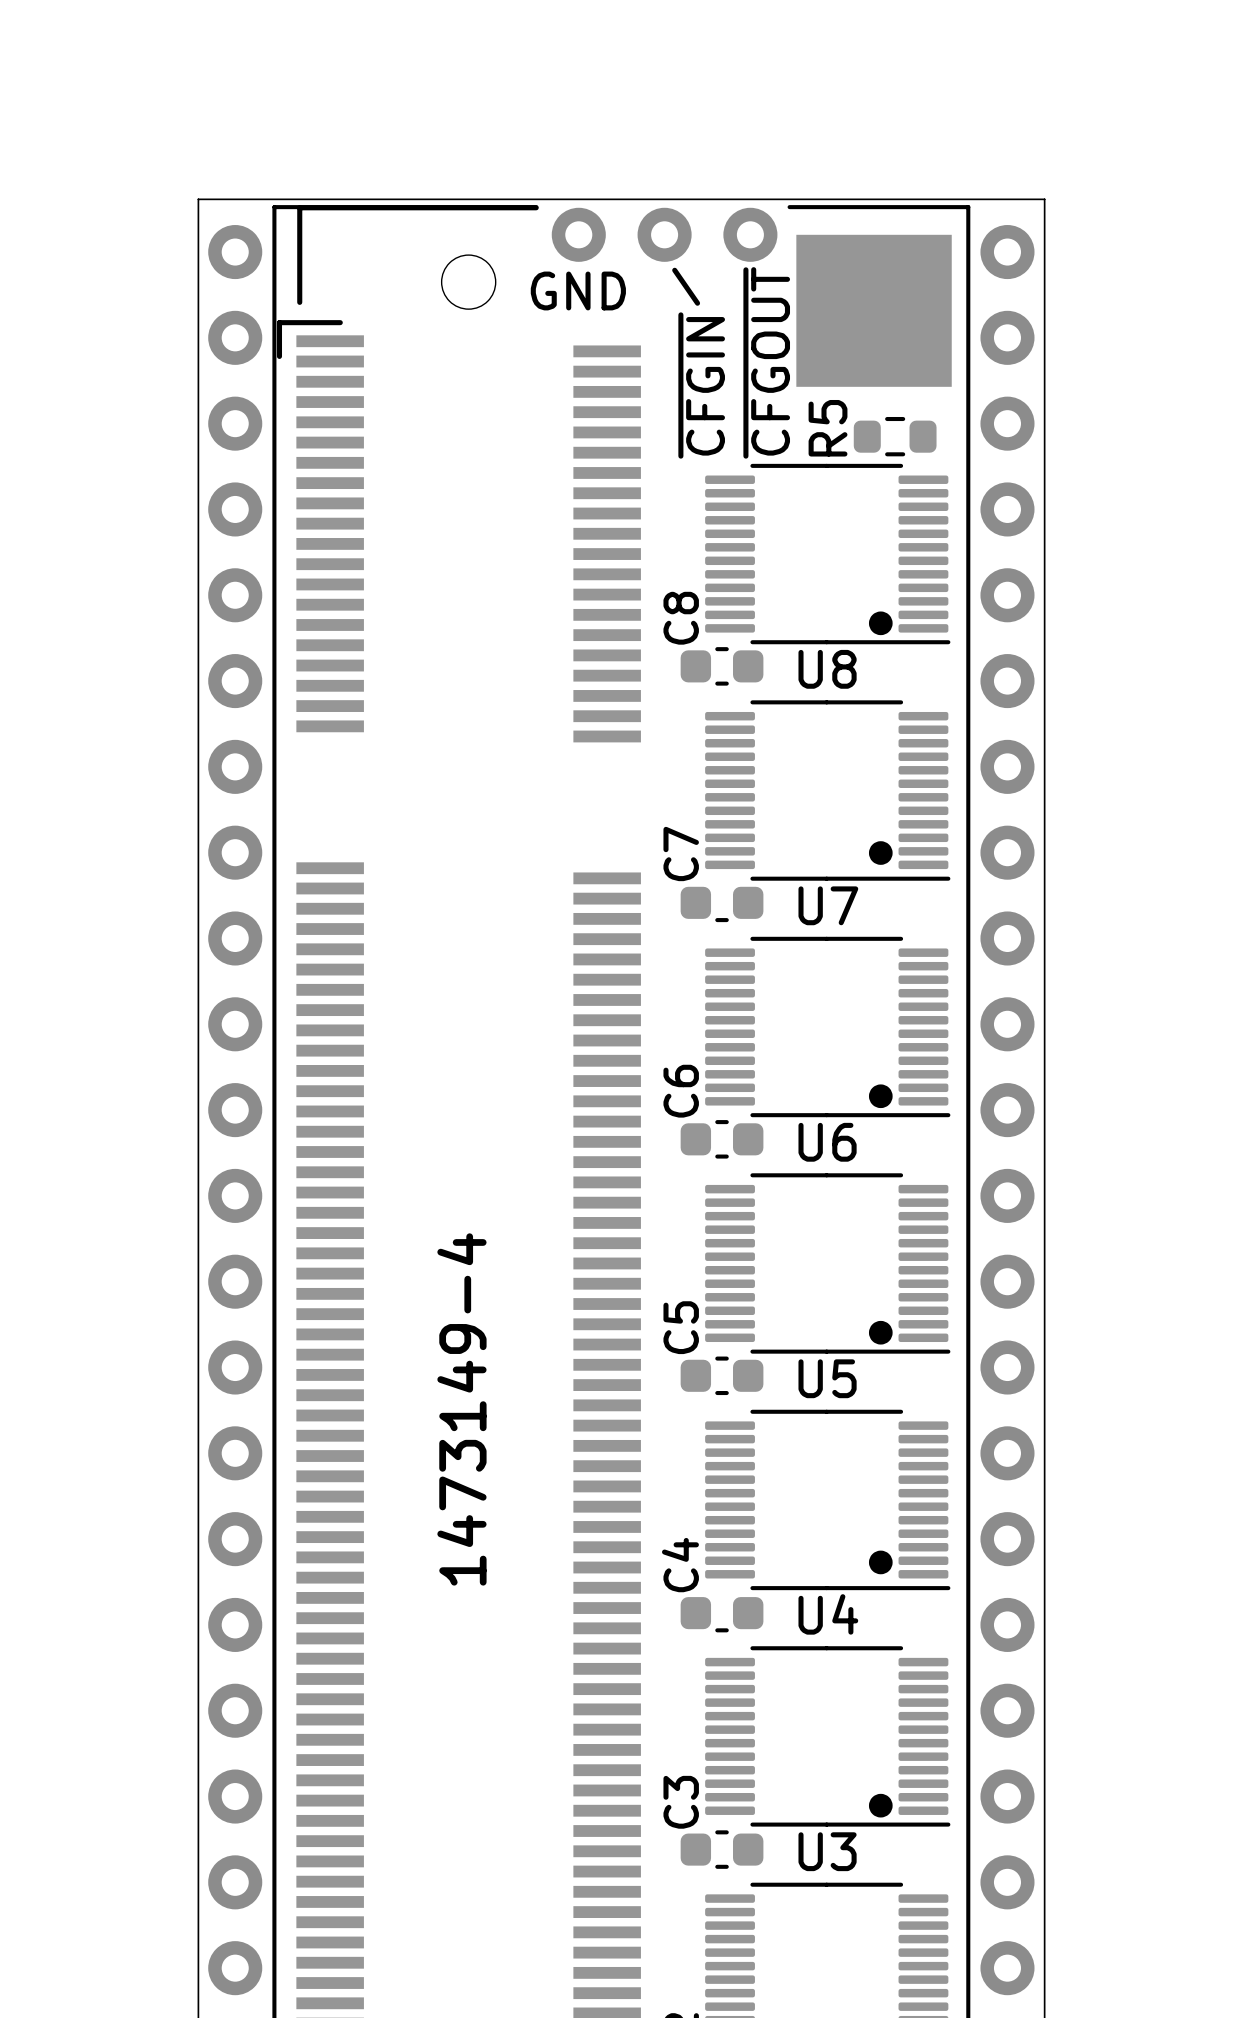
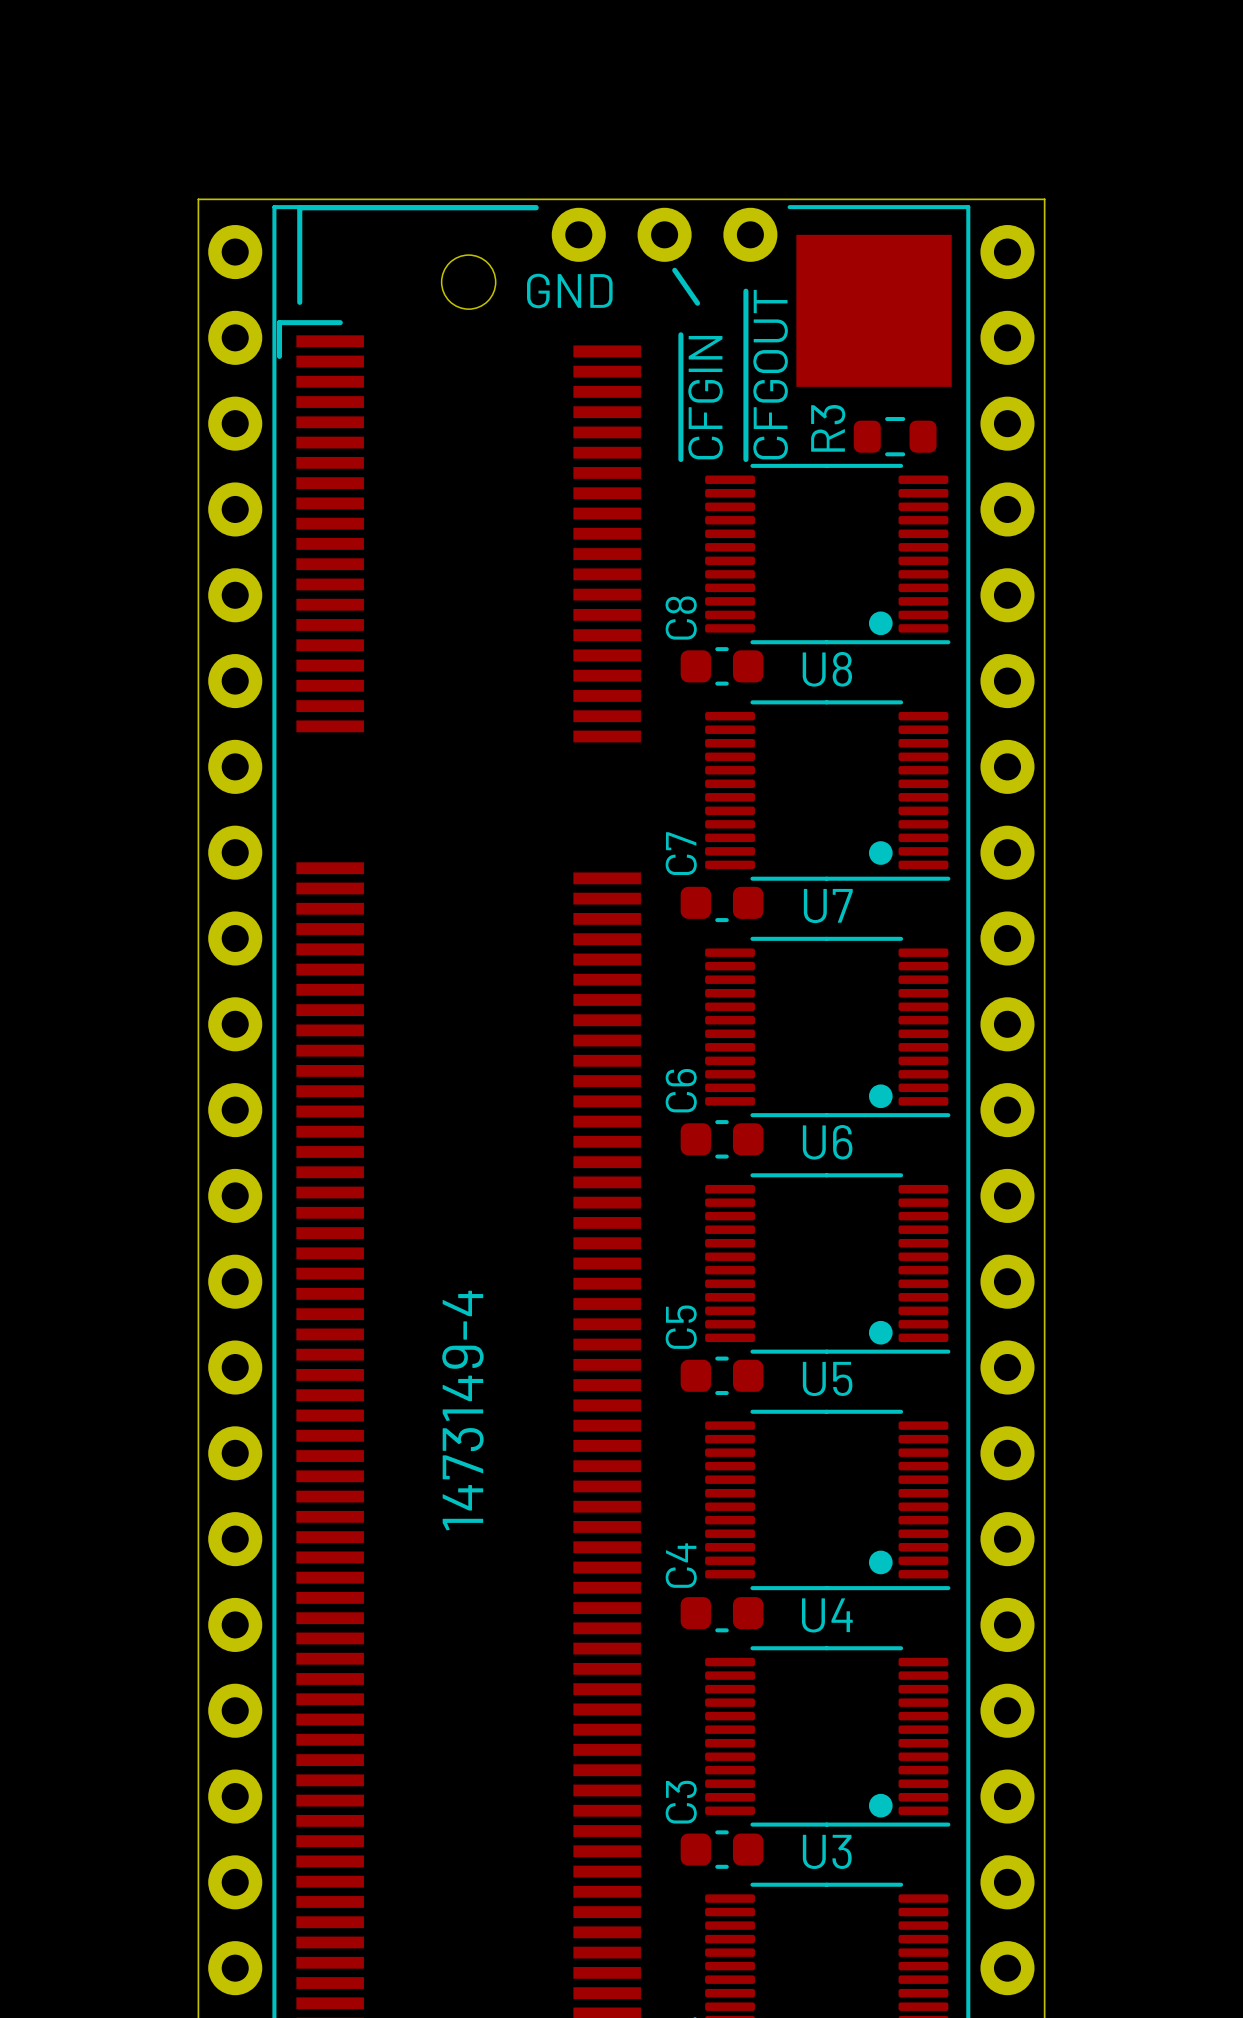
R5 name: R5 (828, 428) -> R3 (828, 428)

